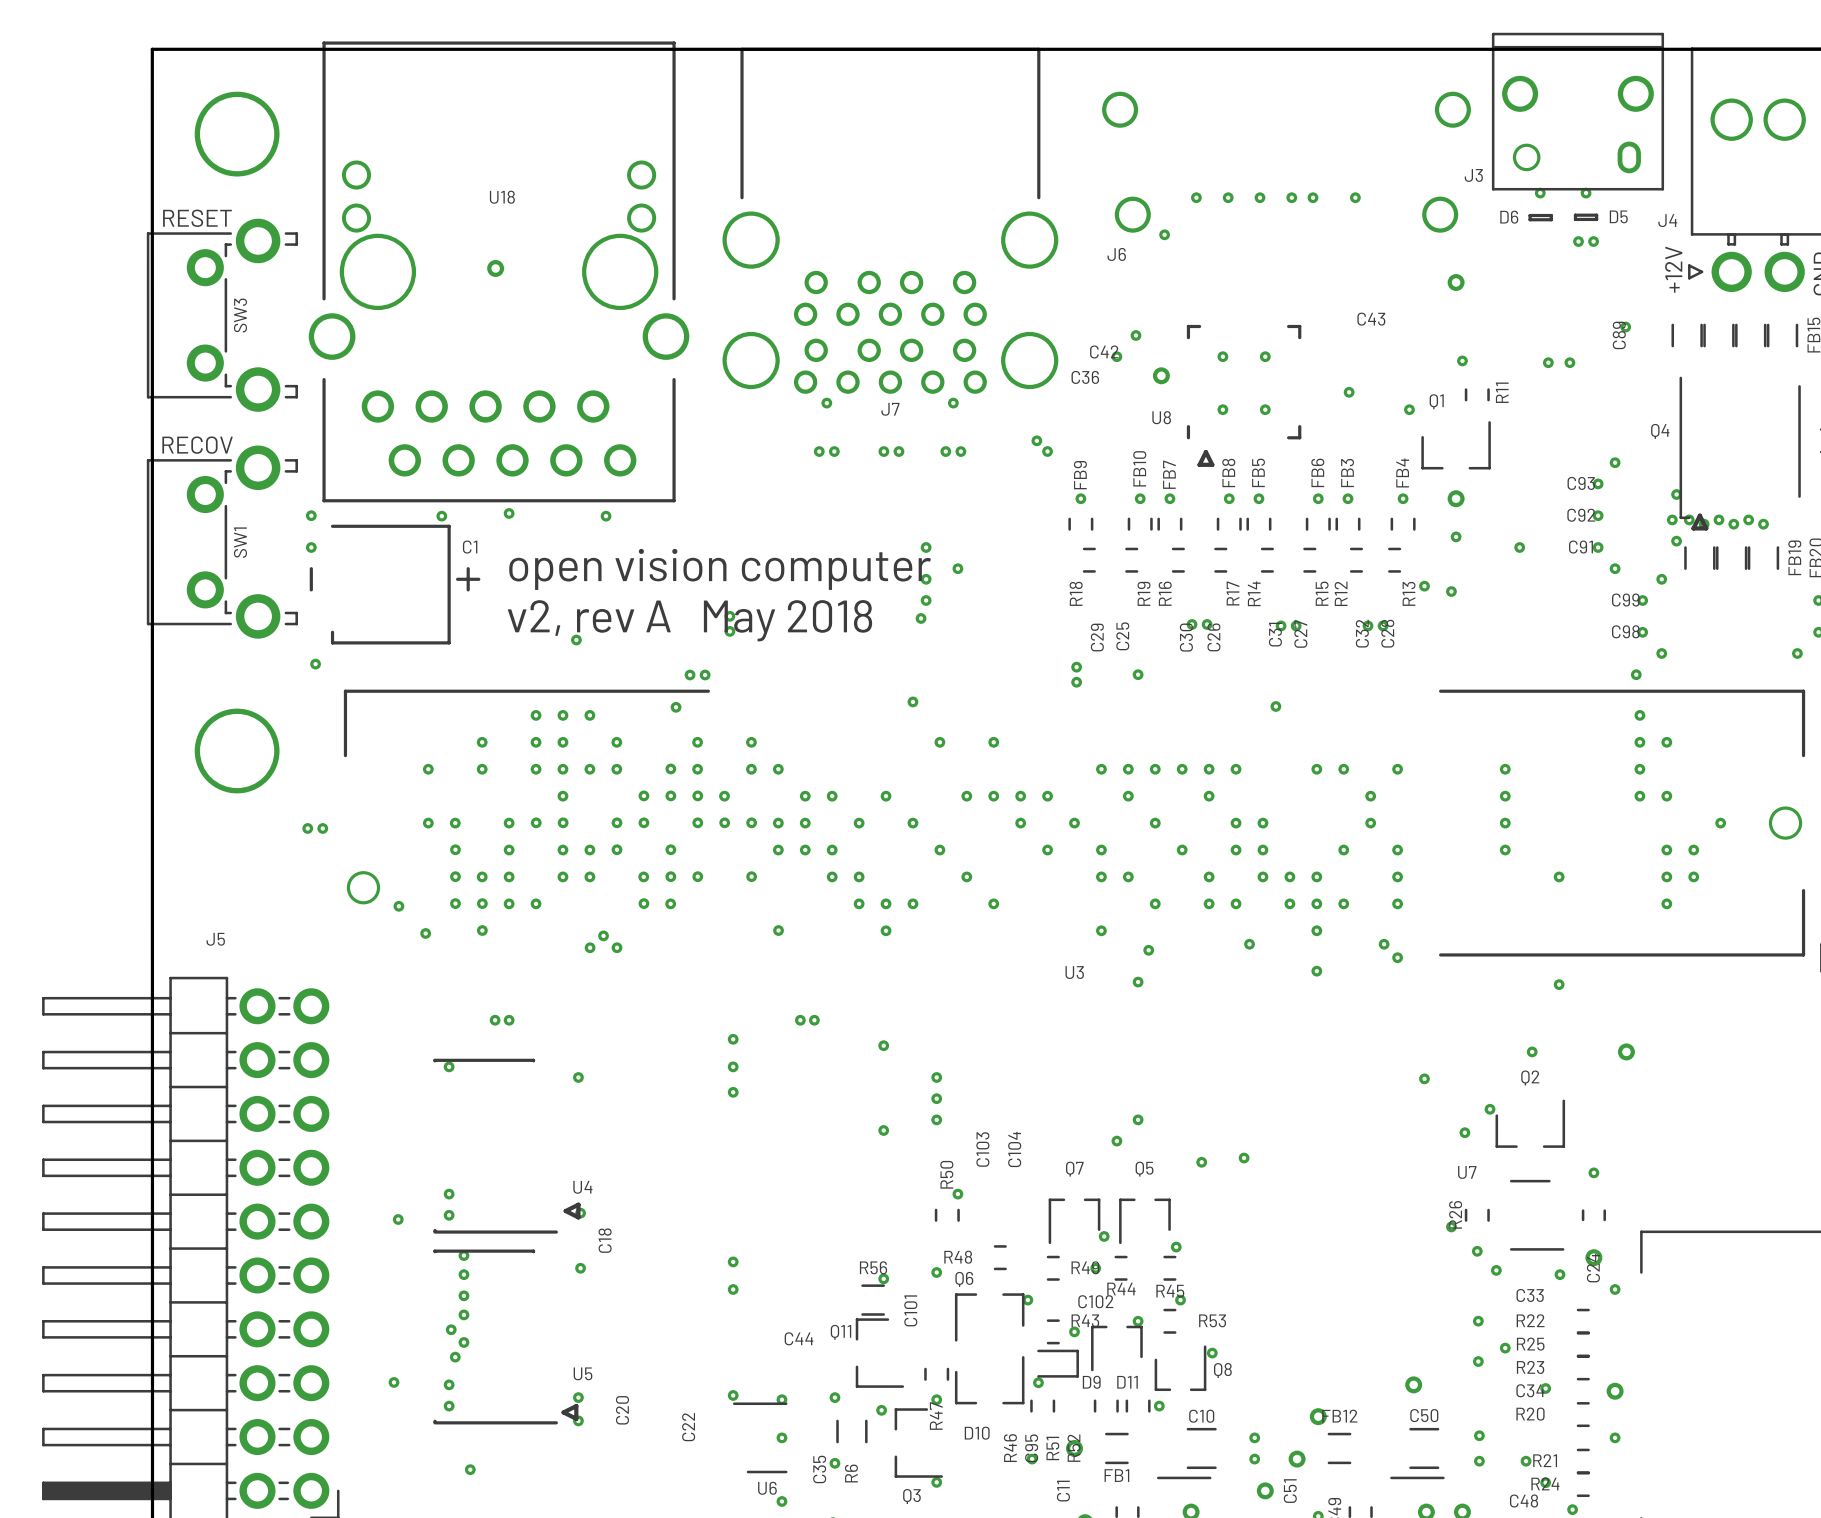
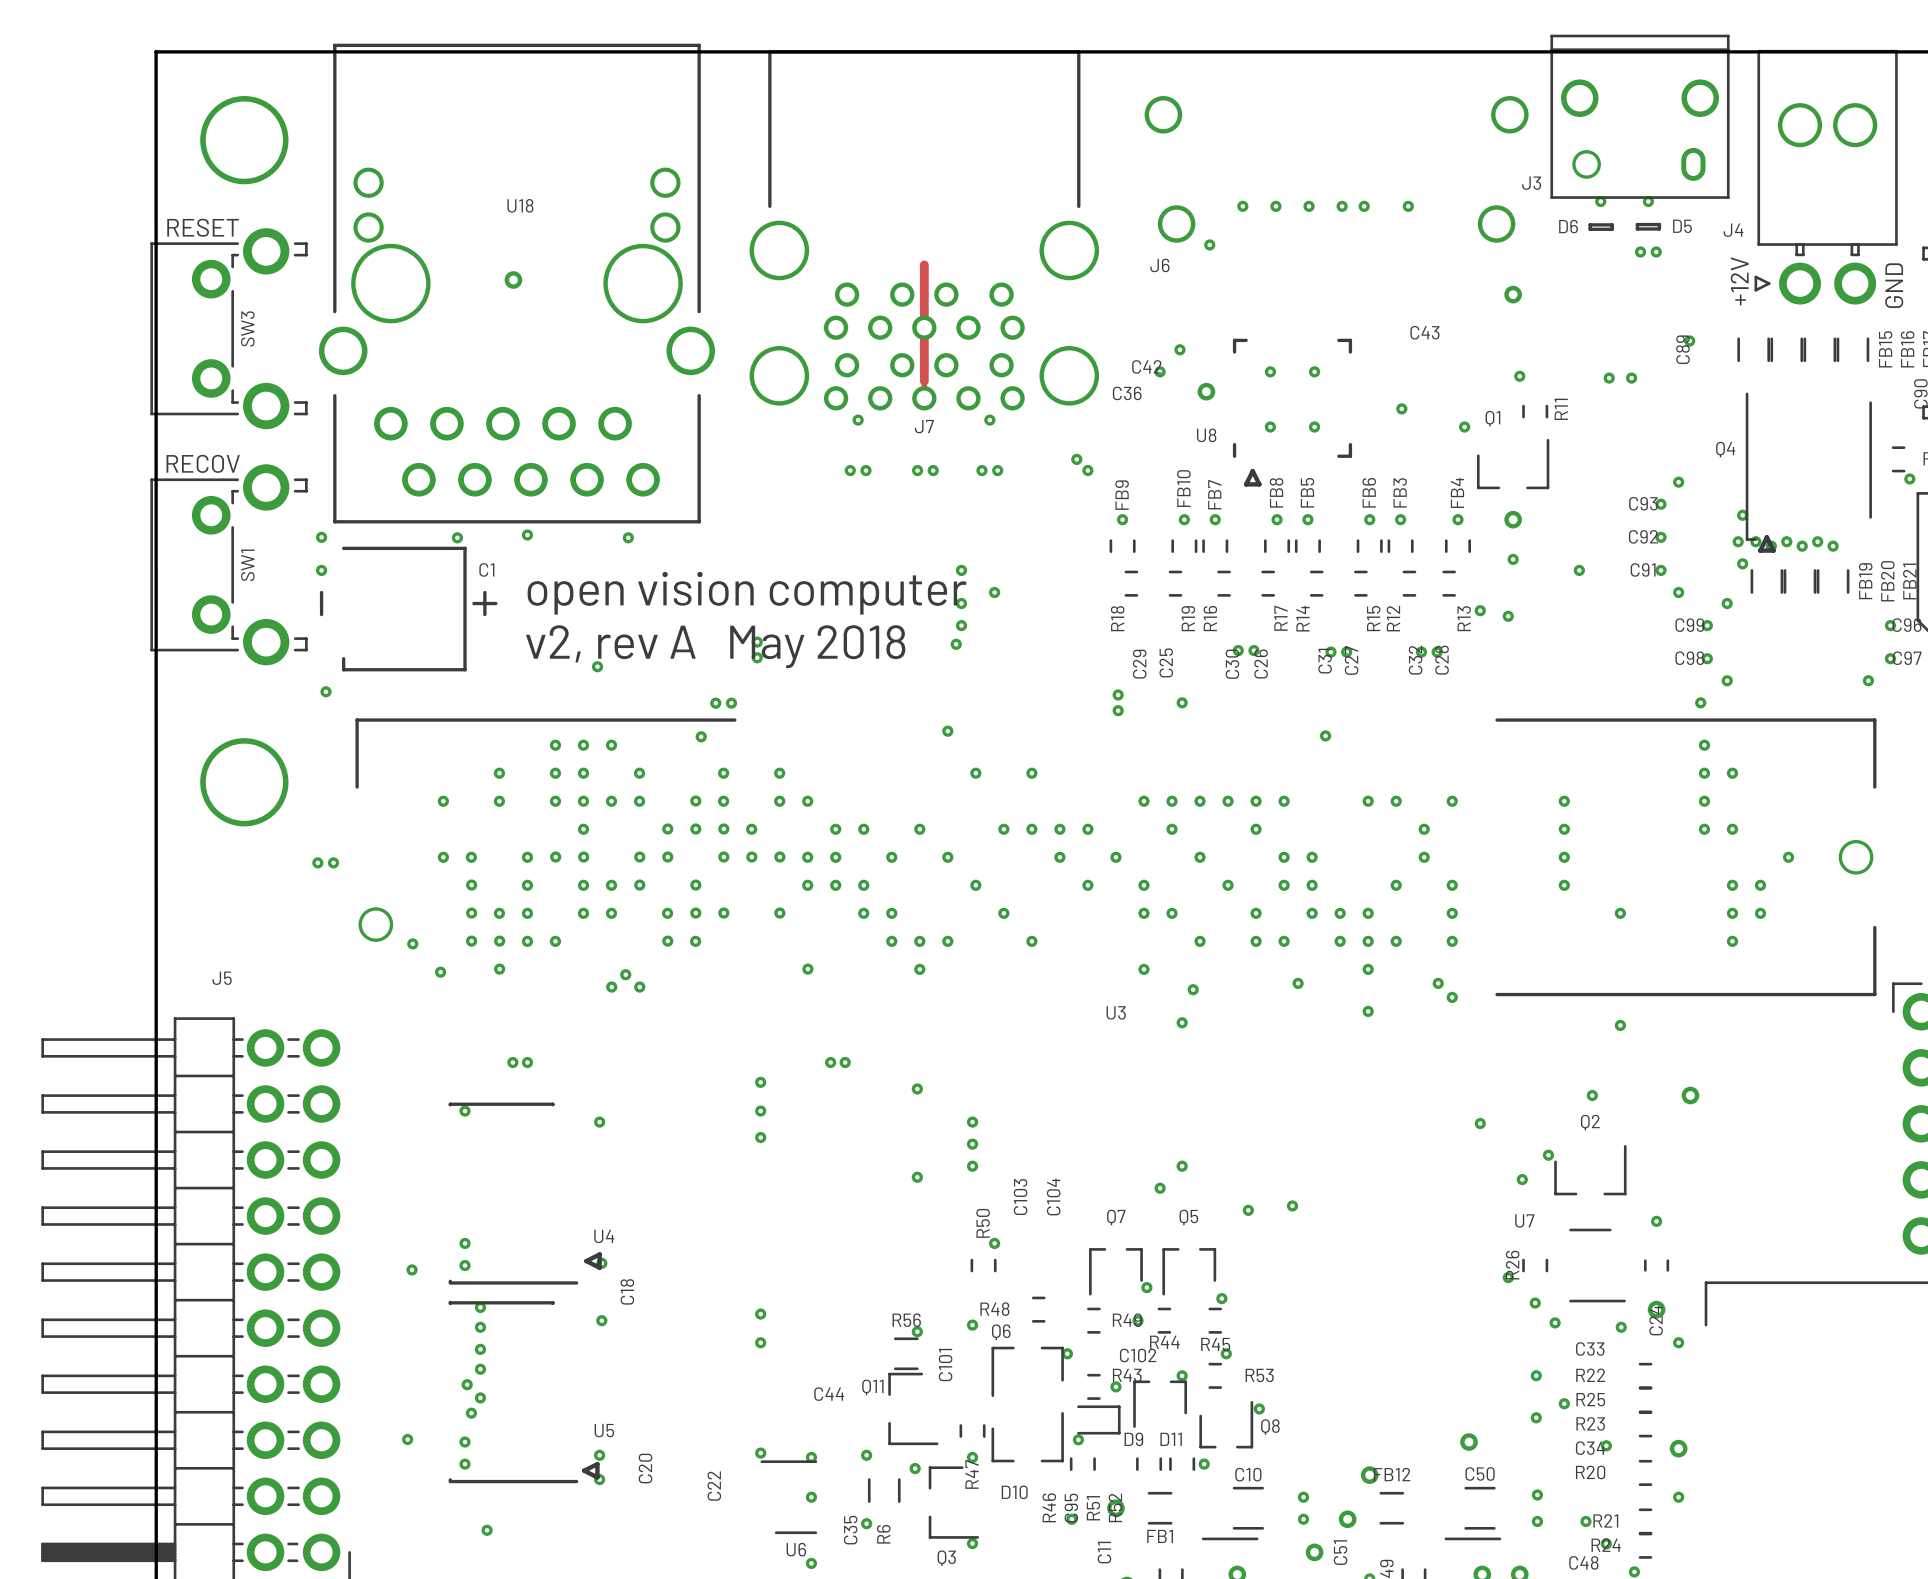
track: none -> (924, 264) (924, 398)

